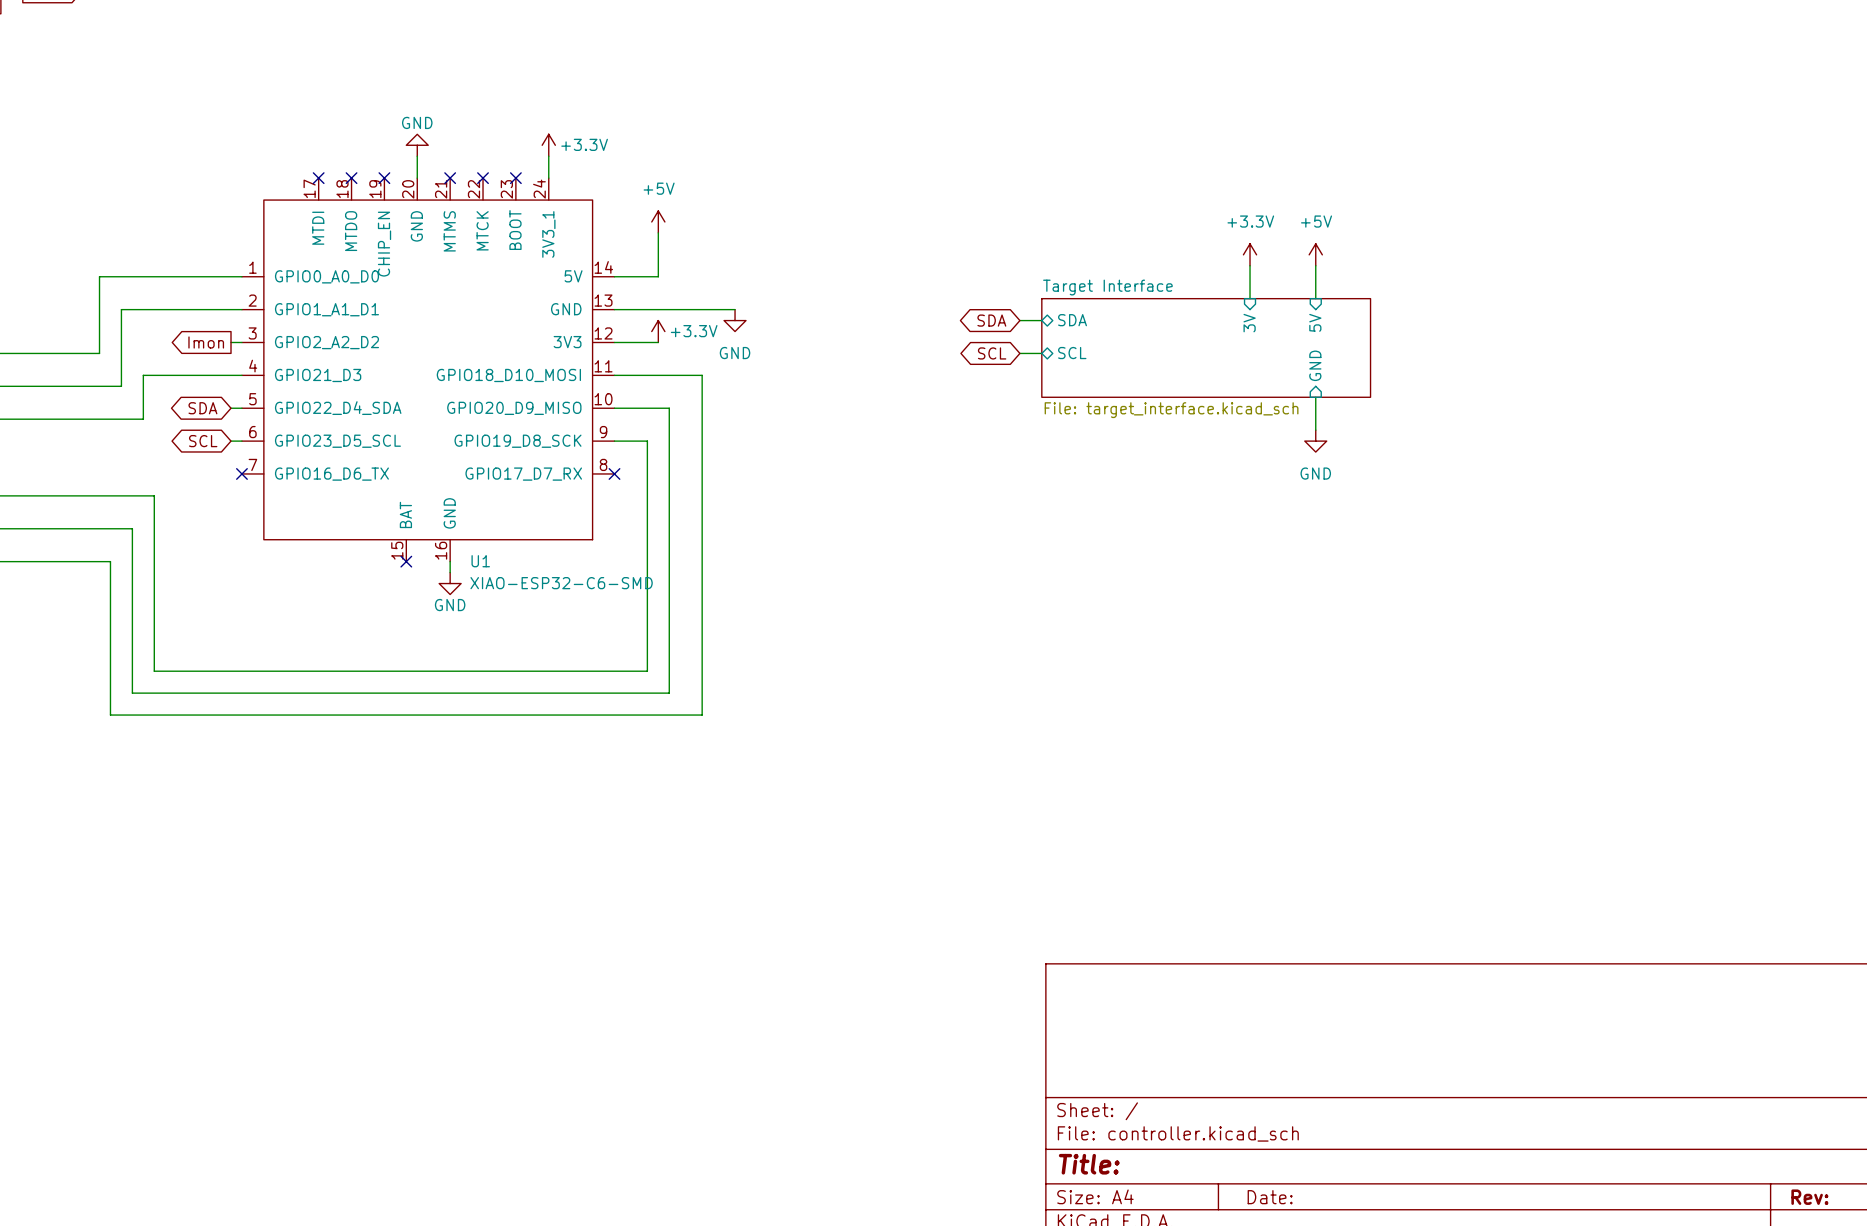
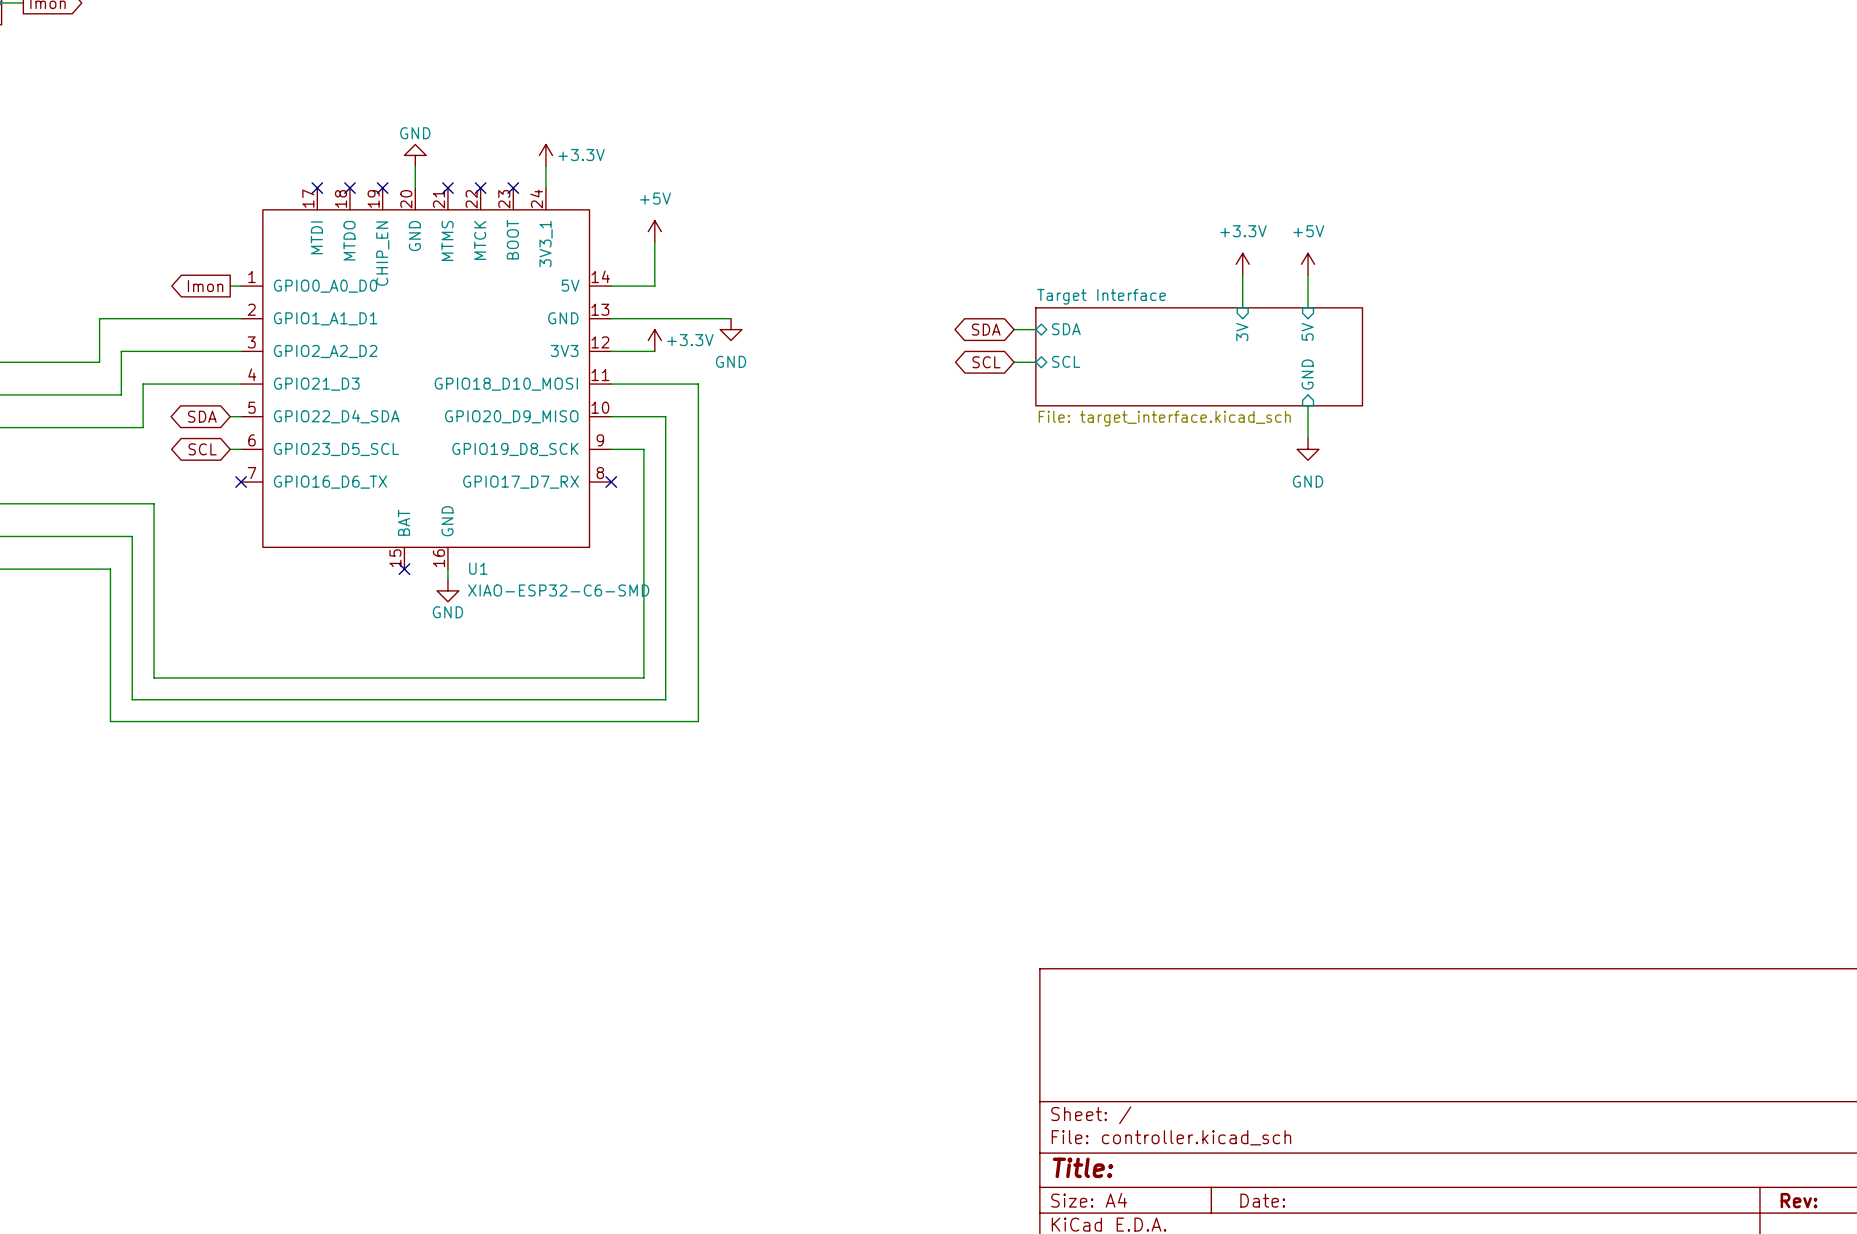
wire: (231, 276) (99, 276) (99, 309) -> none
wire: (121, 309) (121, 342) -> (121, 318) (99, 318)
wire: none -> (121, 351) (230, 351)
global label position: Imon (206, 342) -> Imon (205, 286)

